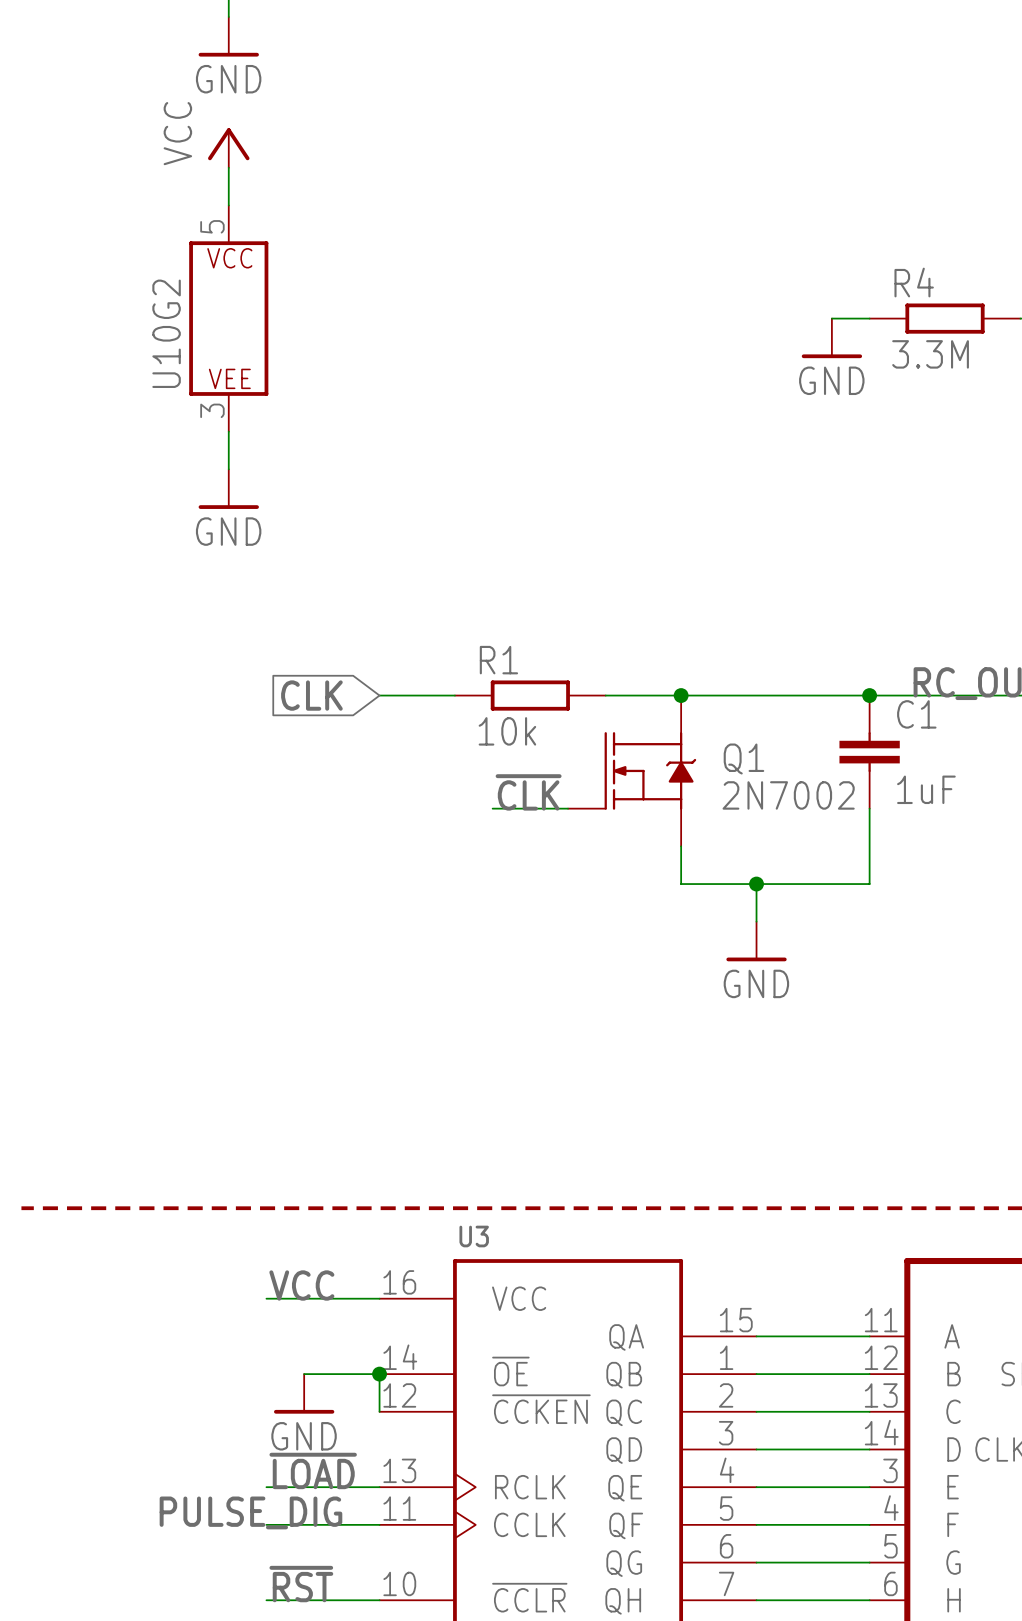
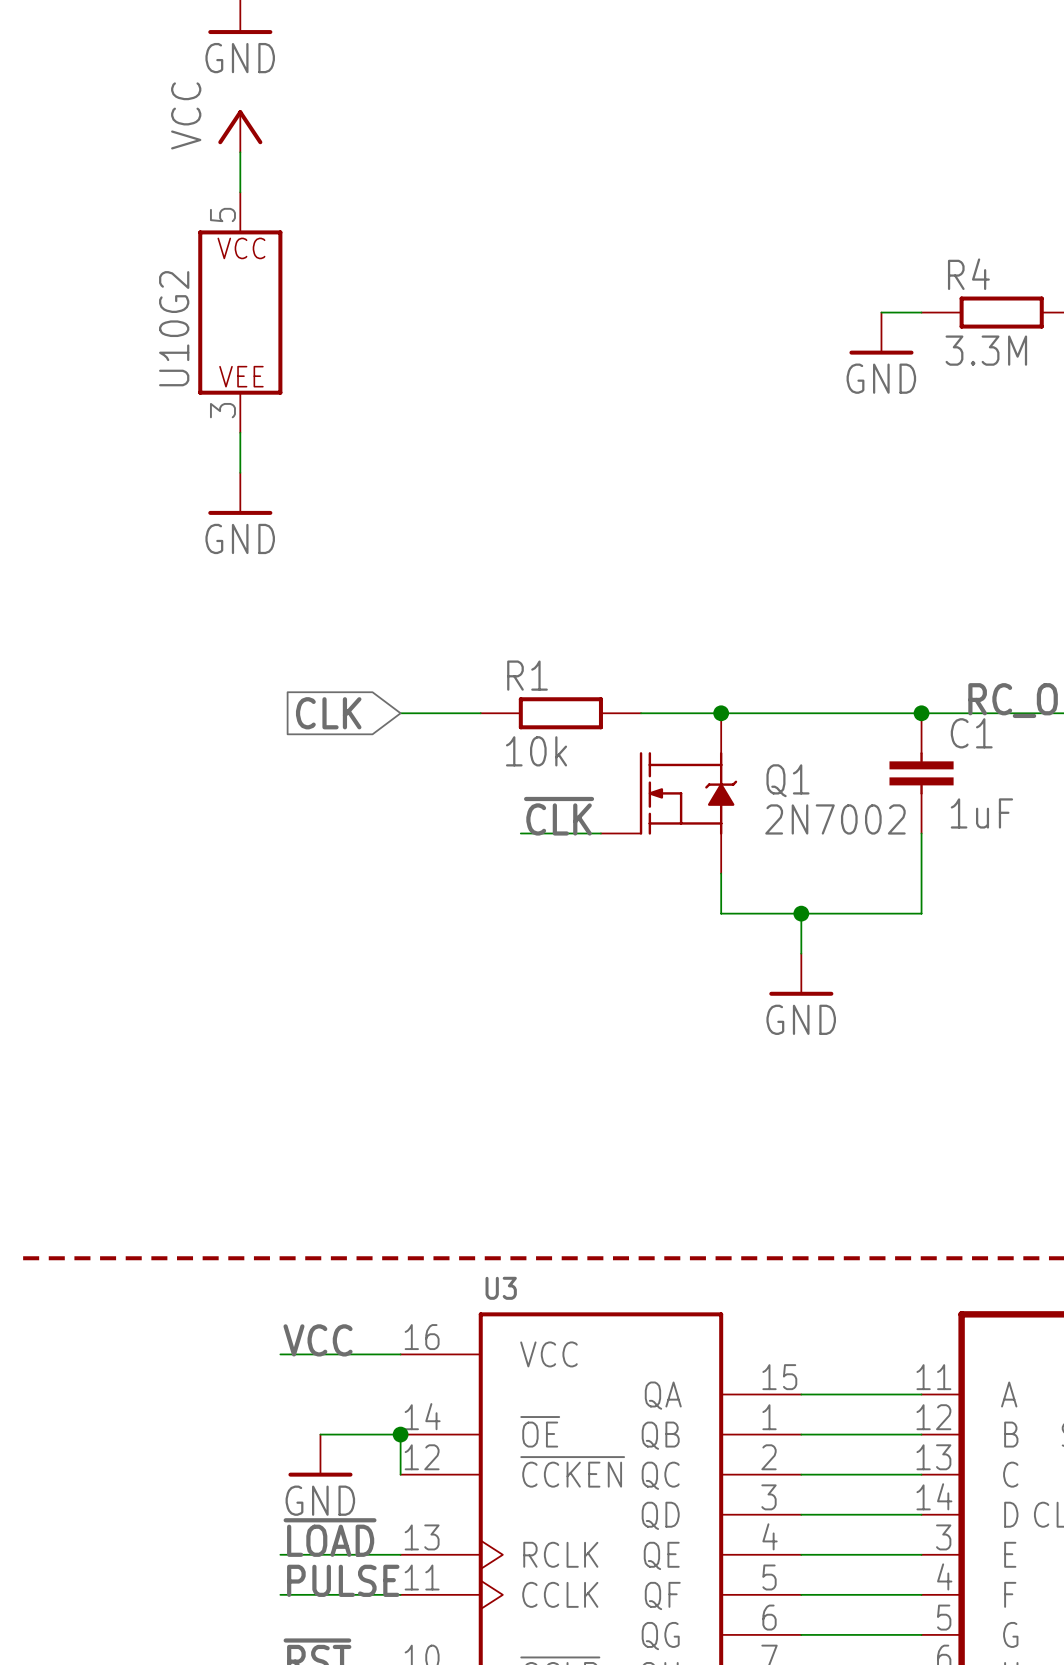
label: PULSE_DIG (250, 1512) -> PULSE (343, 1580)

